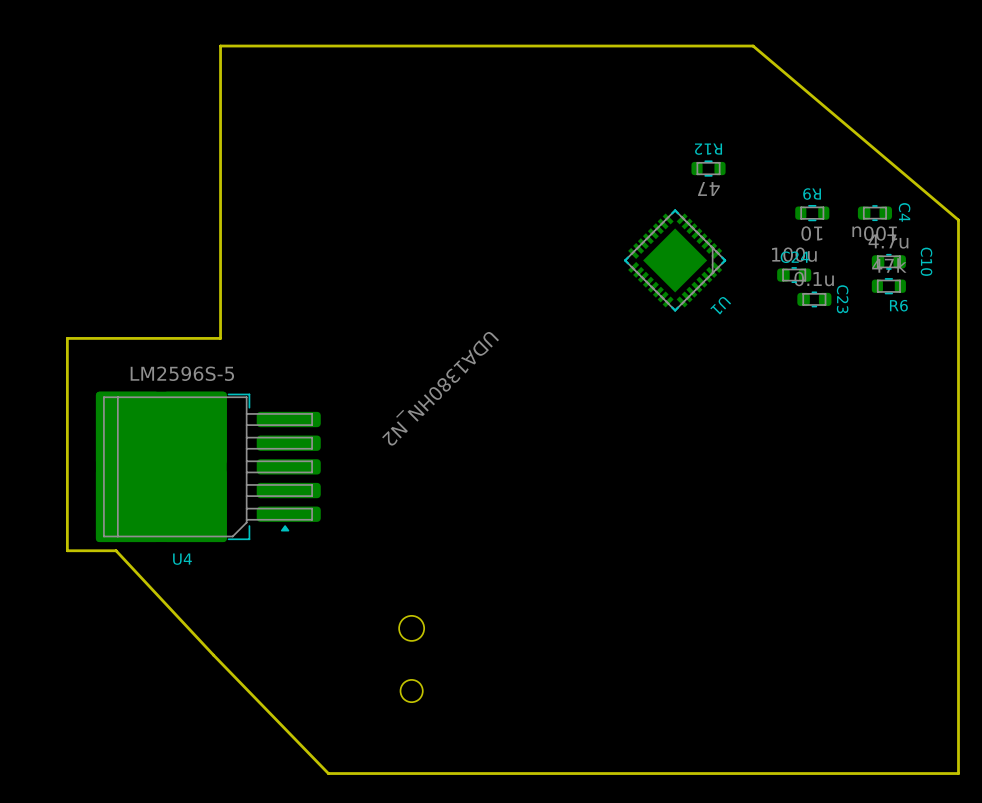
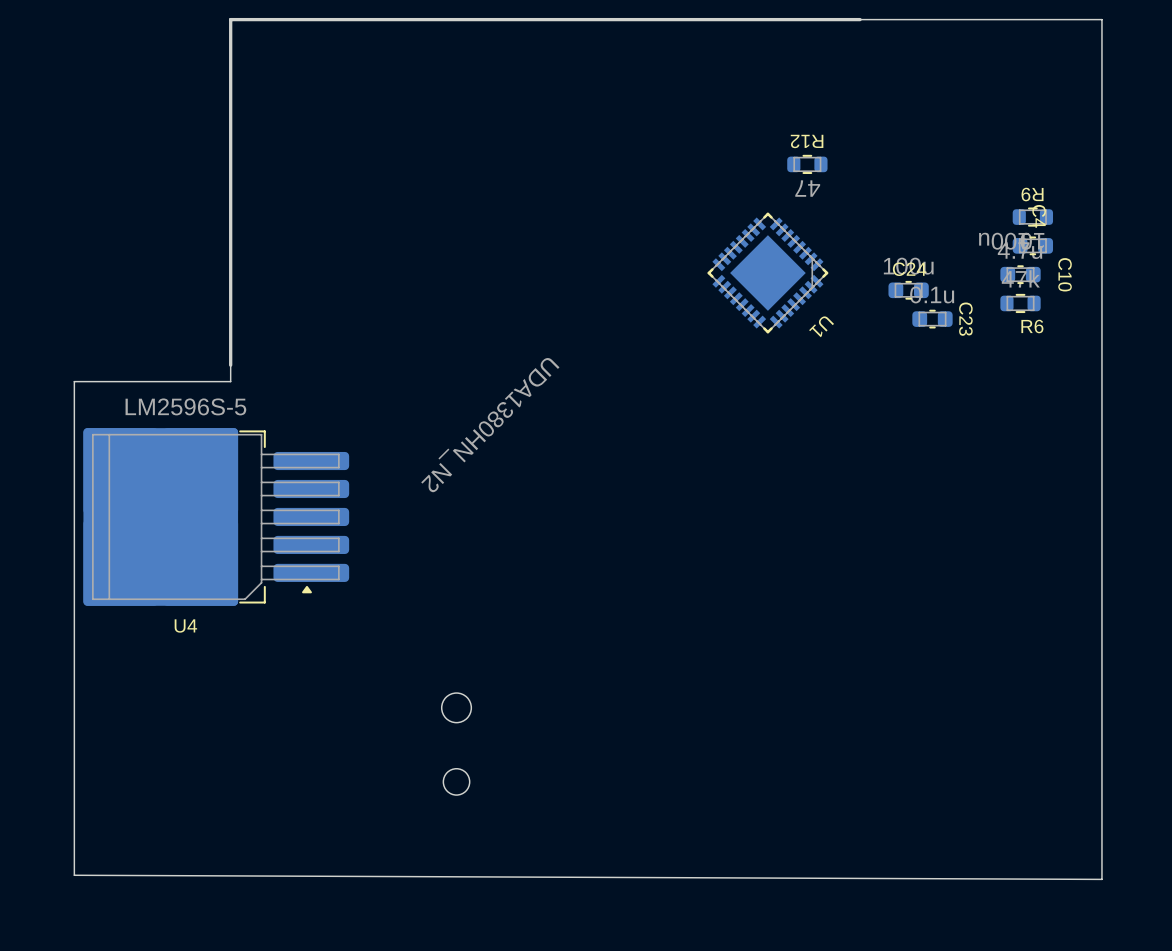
board edge: (753, 46) (958, 220) (958, 773) (328, 773) (116, 550) (67, 550) (67, 338) (220, 338) -> (860, 19) (1101, 19) (1101, 879) (74, 875) (74, 381) (230, 381) (230, 365)
R9 position: (812, 213) -> (1032, 217)
C4 position: (874, 213) -> (1032, 245)

